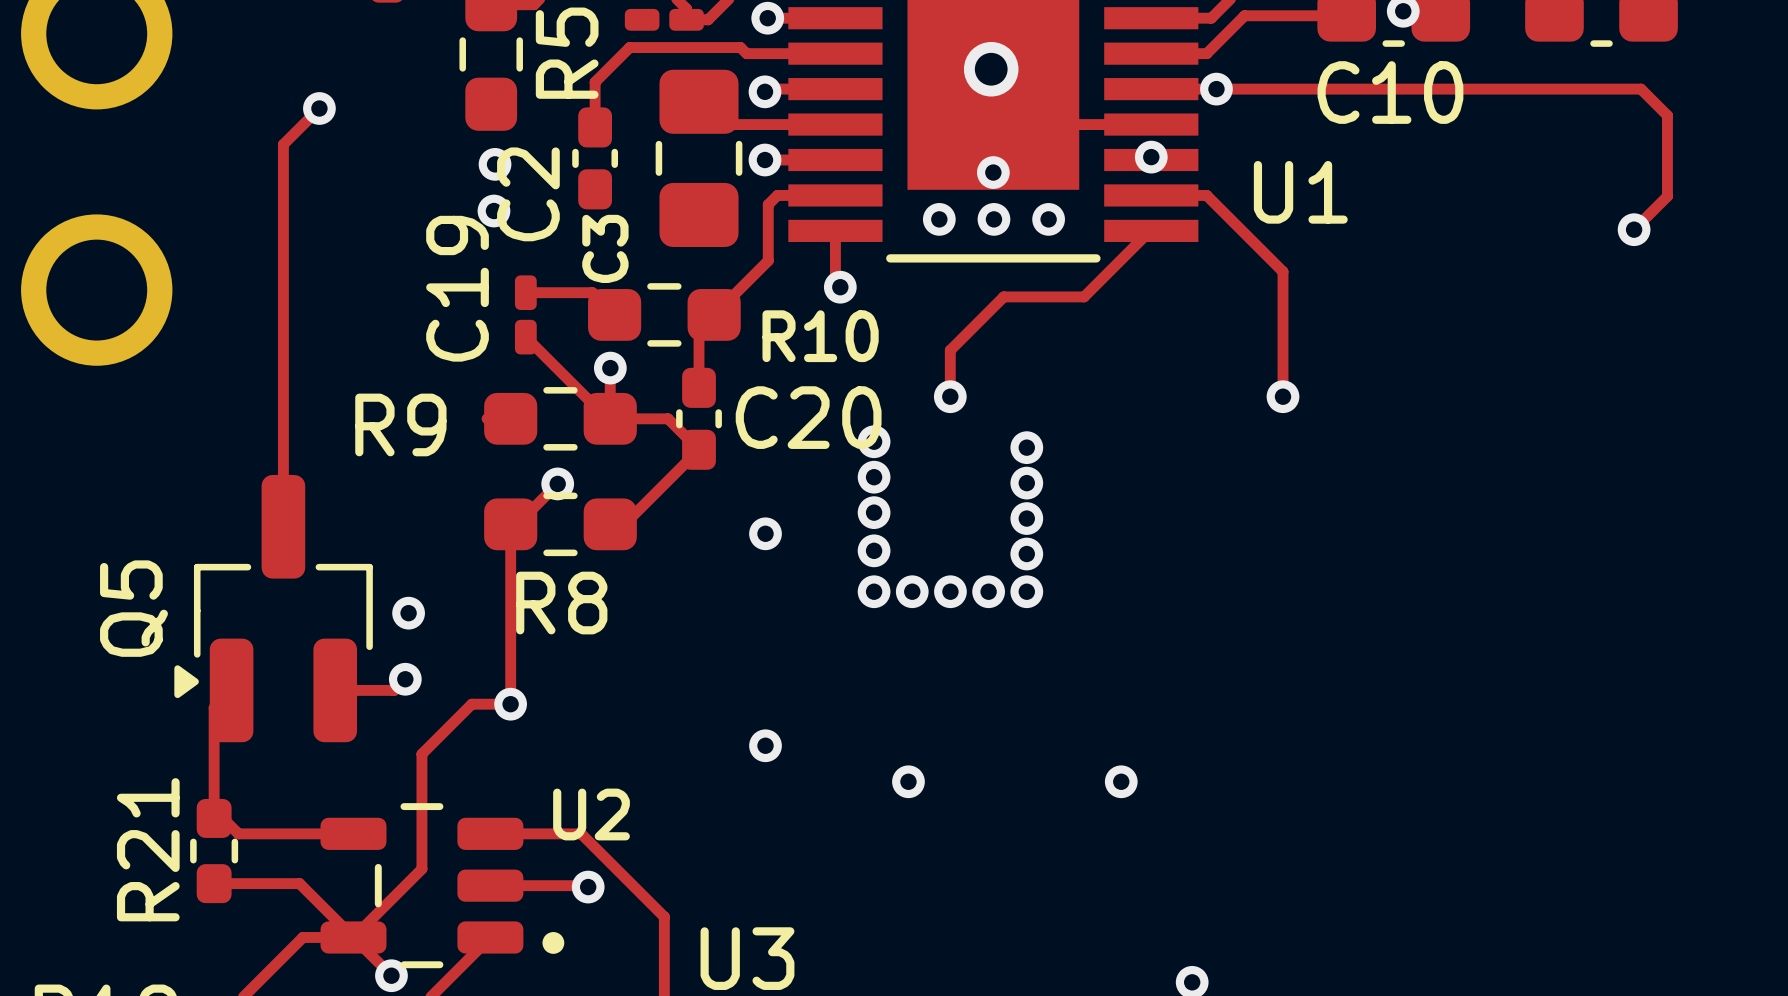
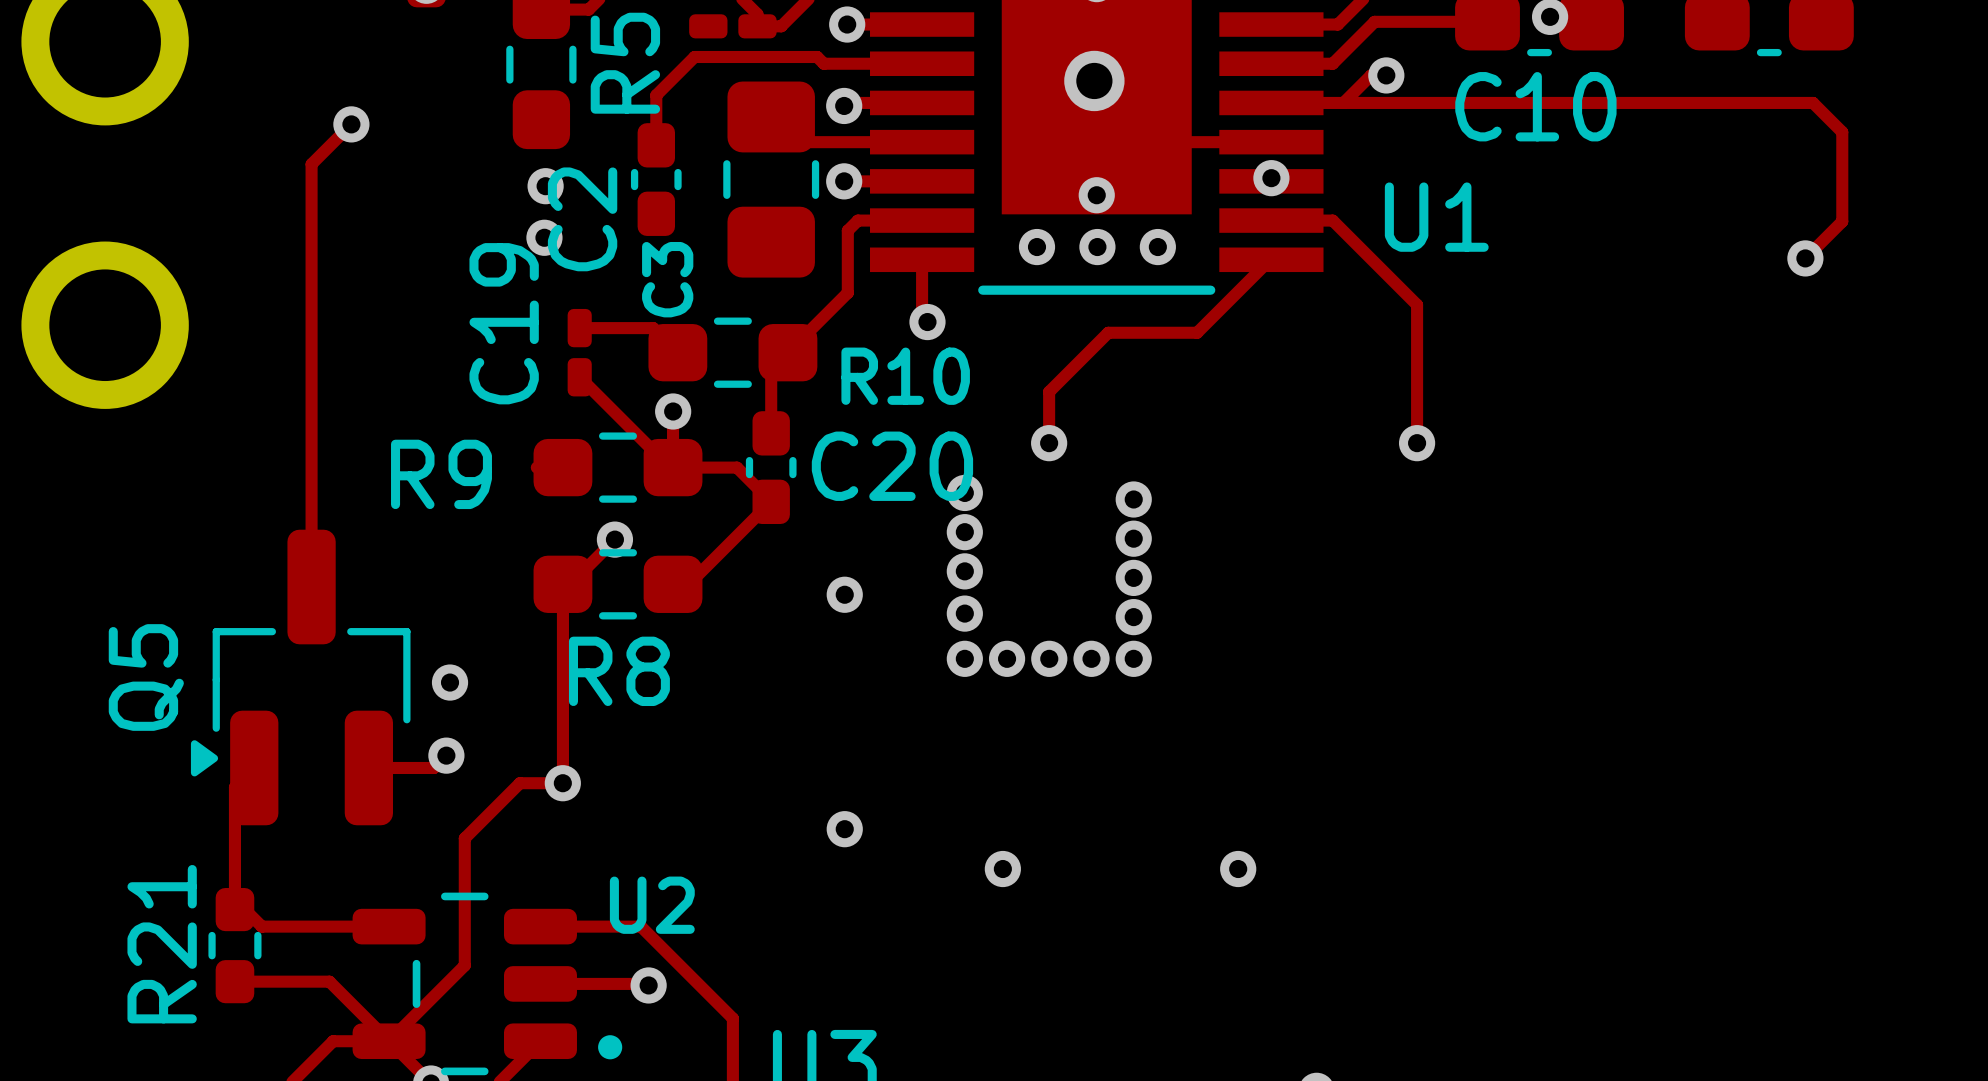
track: none -> (1386, 75) (1371, 75) (1343, 102)
via position: (1216, 89) -> (1386, 75)

